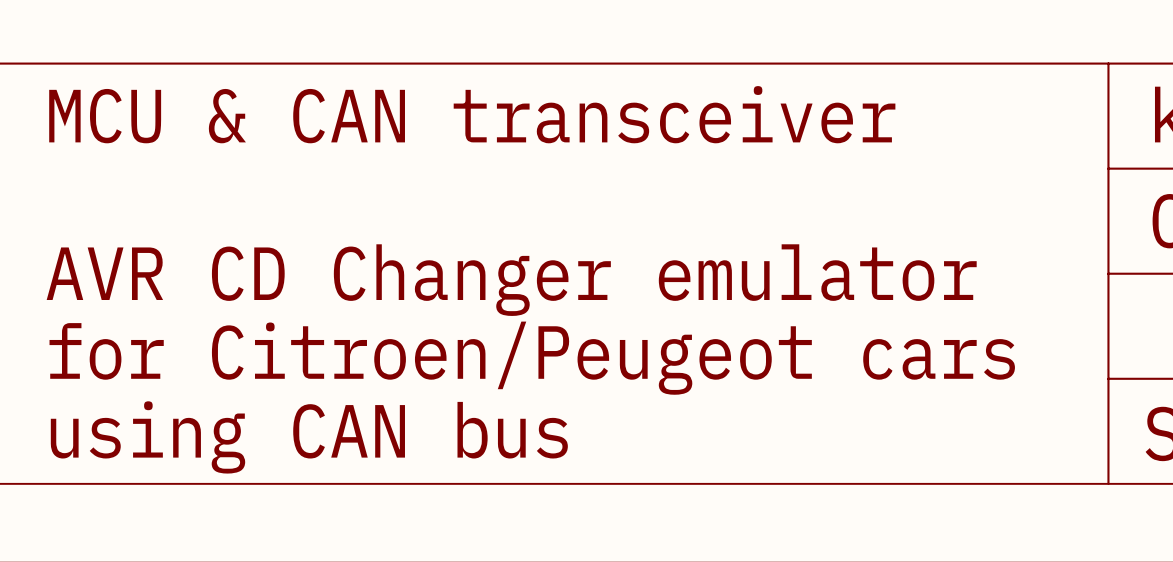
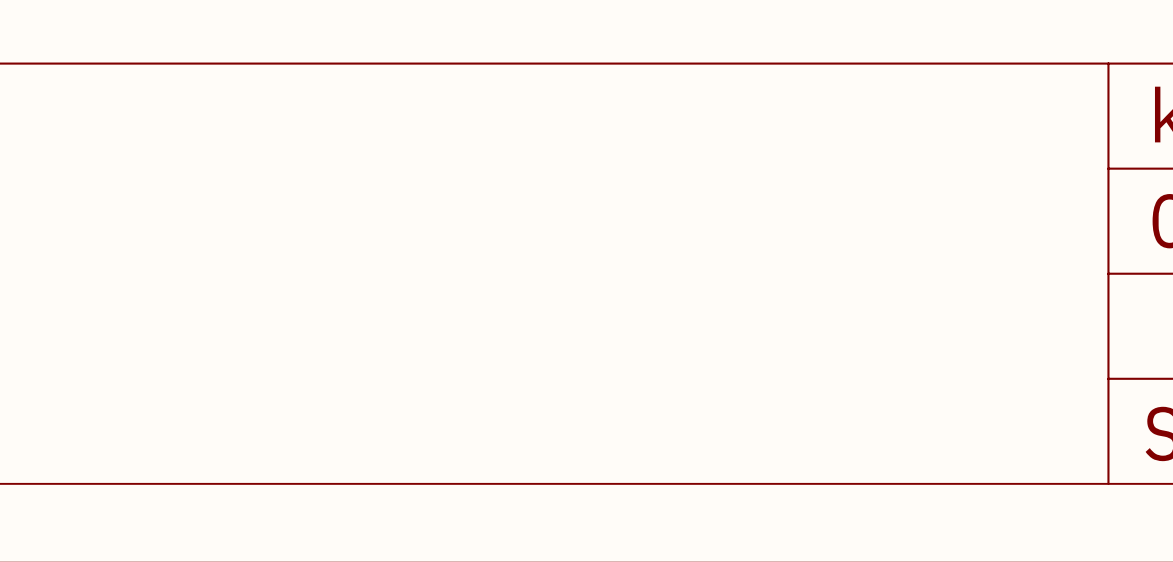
text: MCU & CAN transceiver (472, 114) -> none
text: AVR CD Changer emulator (511, 280) -> none
text: for Citroen/Peugeot cars (532, 358) -> none
text: using CAN bus (309, 437) -> none

